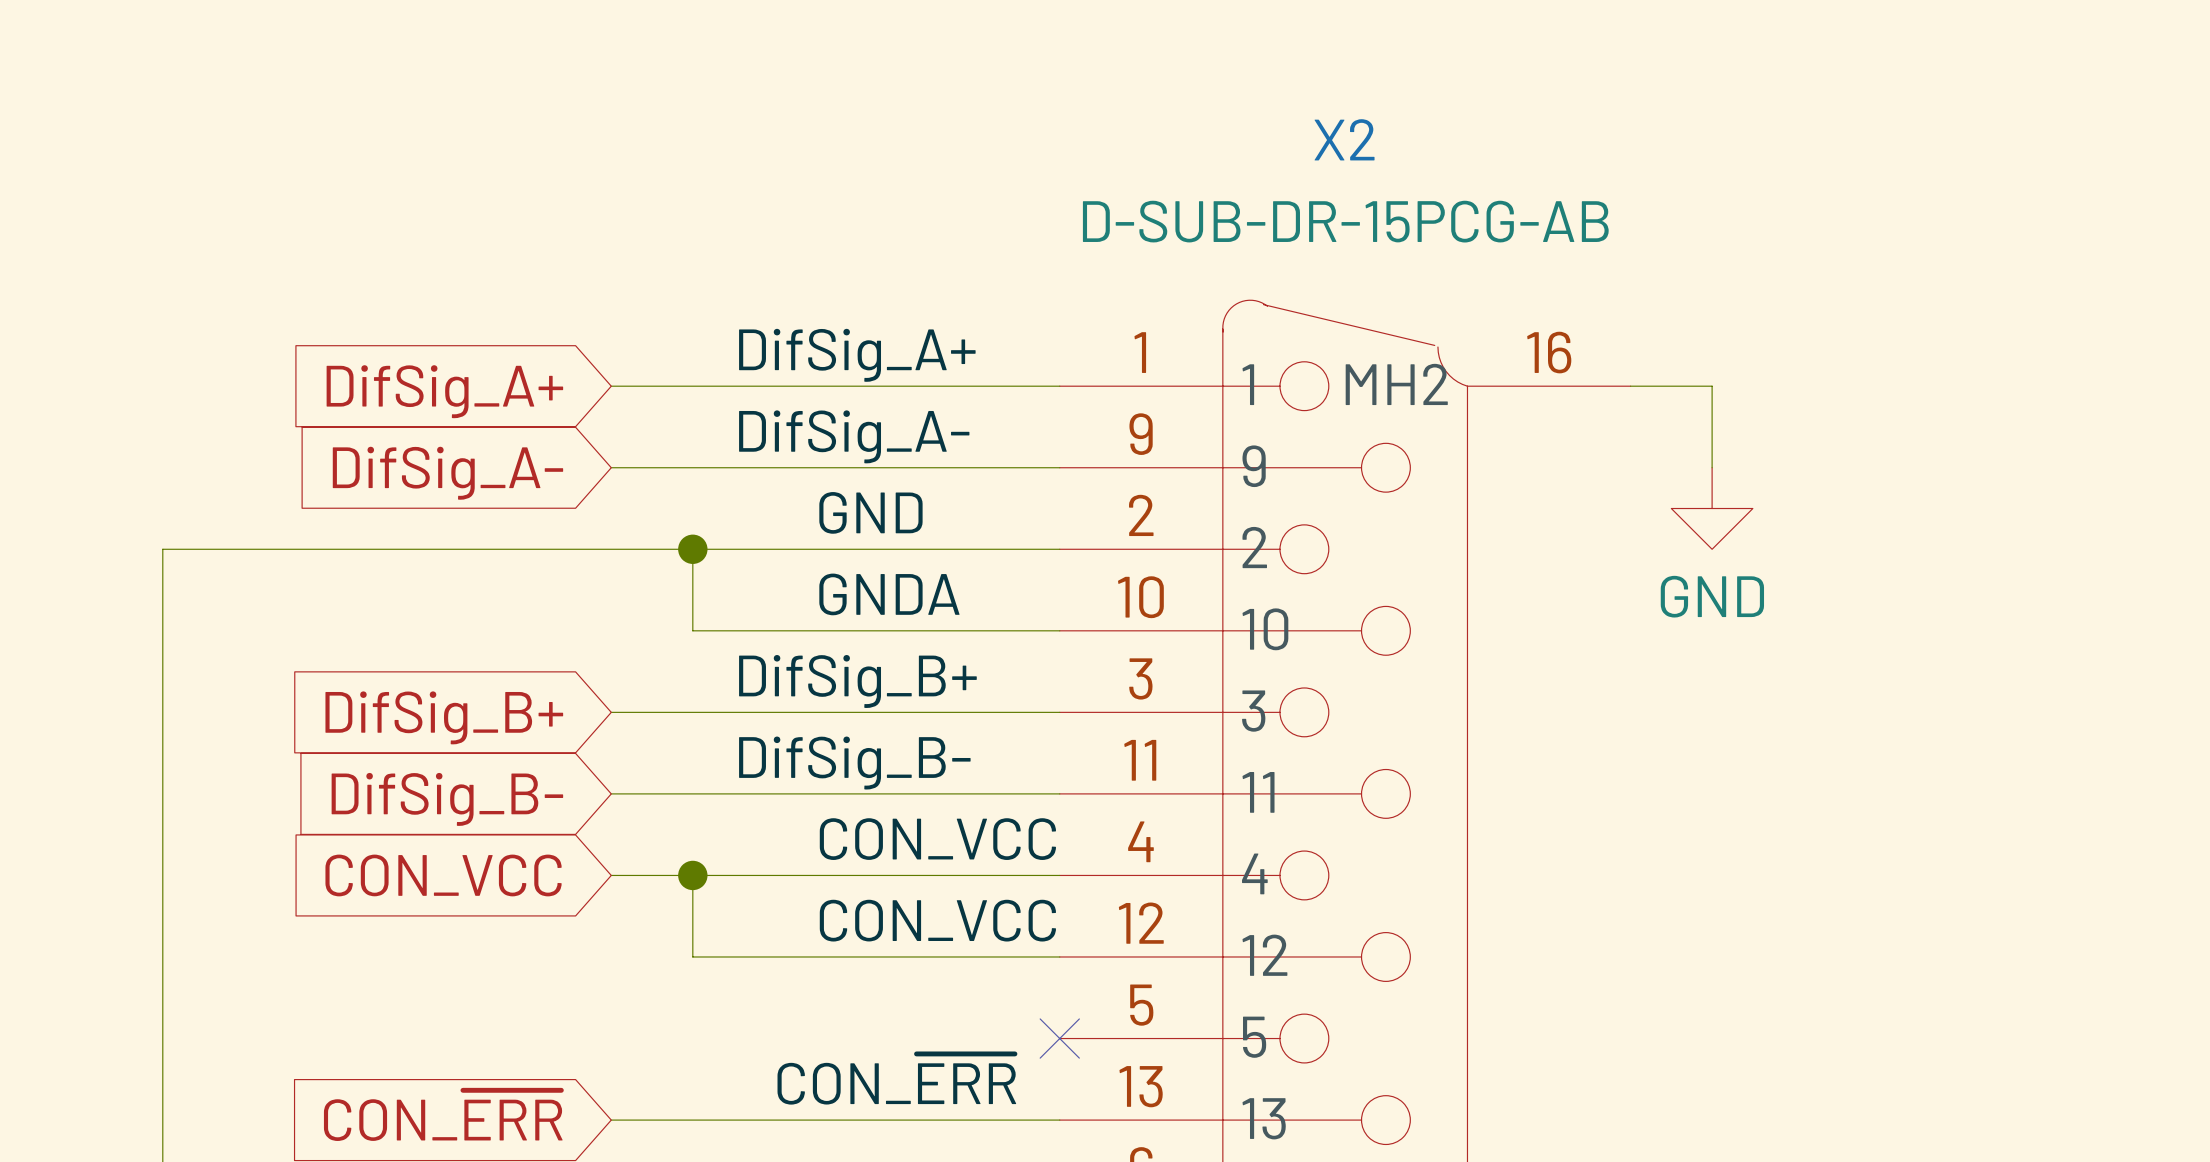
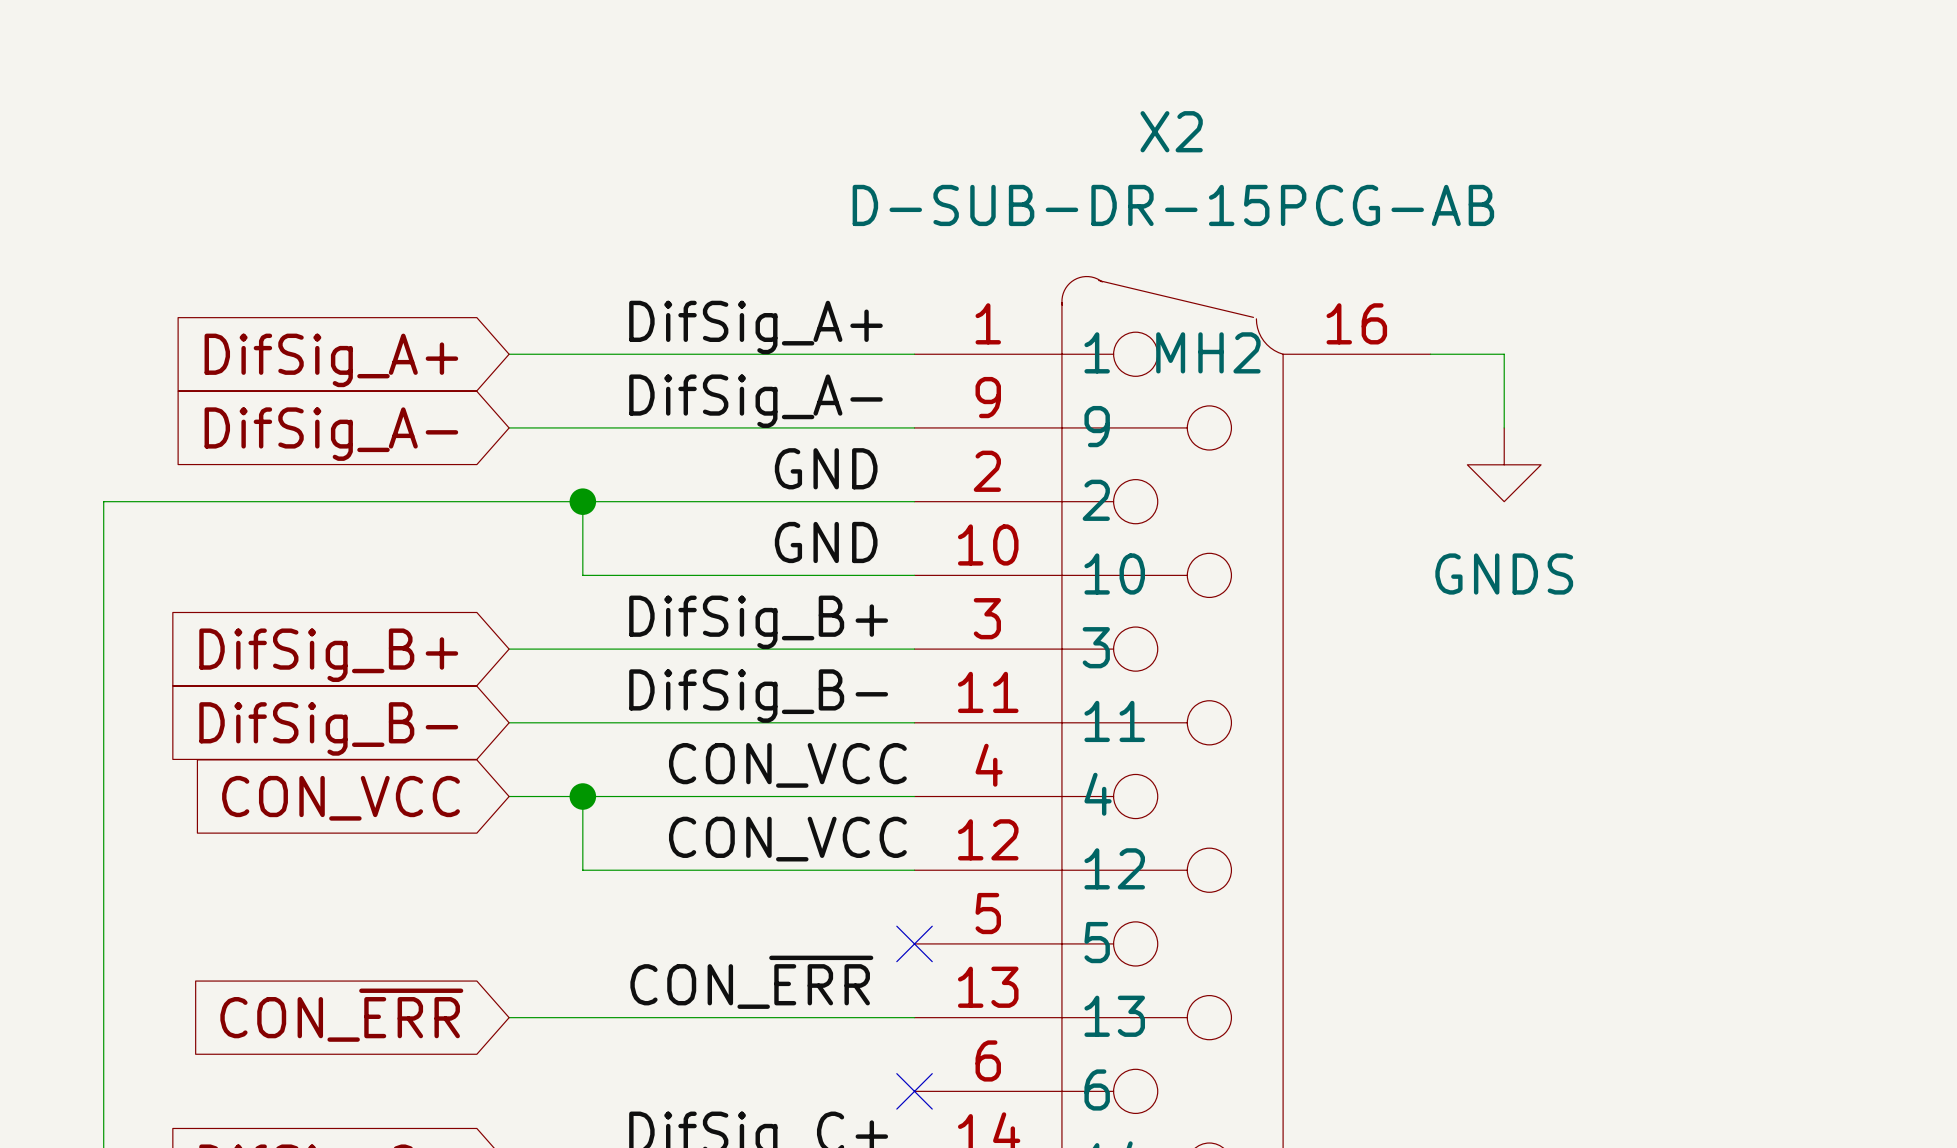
power symbol: GND (1712, 508) -> GNDS (1504, 464)
label: GND (870, 512) -> none
label: none -> GND (826, 468)
label: GNDA (889, 594) -> none
label: none -> GND (826, 542)

